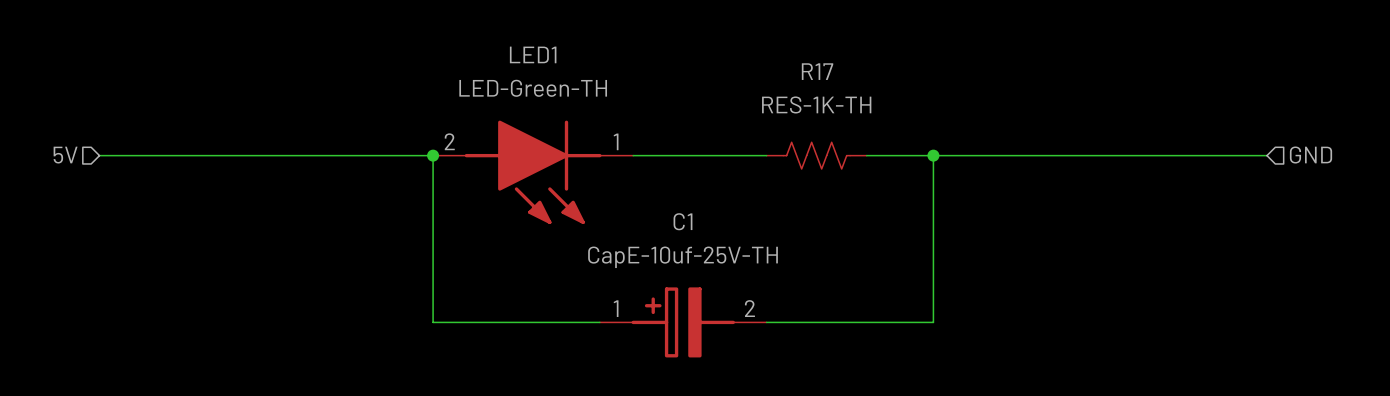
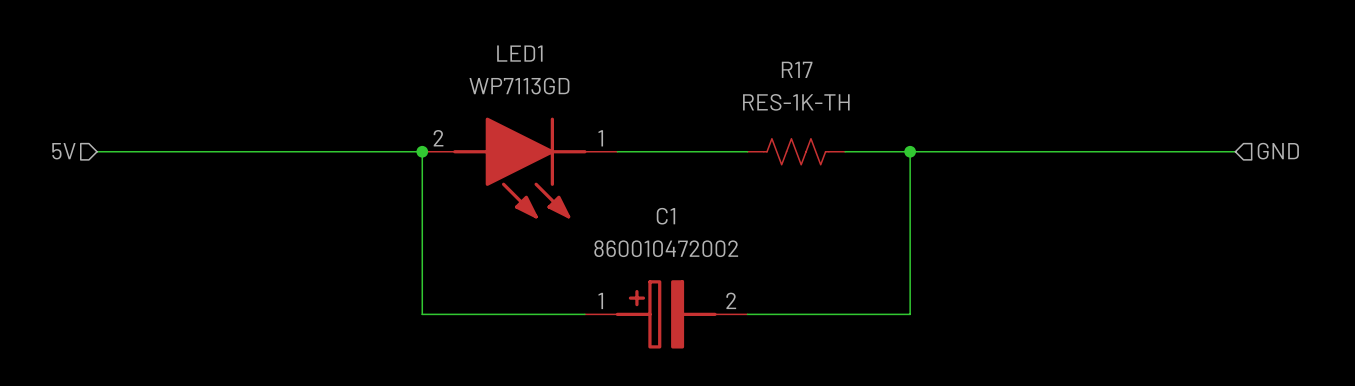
LED1 value: LED-Green-TH (533, 88) -> WP7113GD (519, 86)
C1 value: CapE-10uf-25V-TH (683, 257) -> 860010472002 (666, 248)

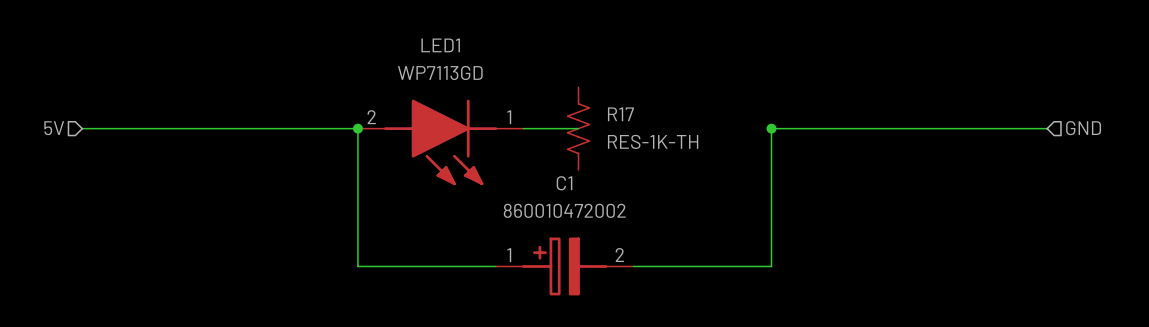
R17 name position: R17 (797, 69) -> R17 (620, 114)
R17 value position: RES-1K-TH (796, 102) -> RES-1K-TH (653, 141)
wire: (682, 151) (747, 151) -> none
R17 rotation: 0° (796, 151) -> 90° clockwise (578, 128)
R17 position: (796, 151) -> (578, 128)
wire: (845, 151) (910, 151) -> none

